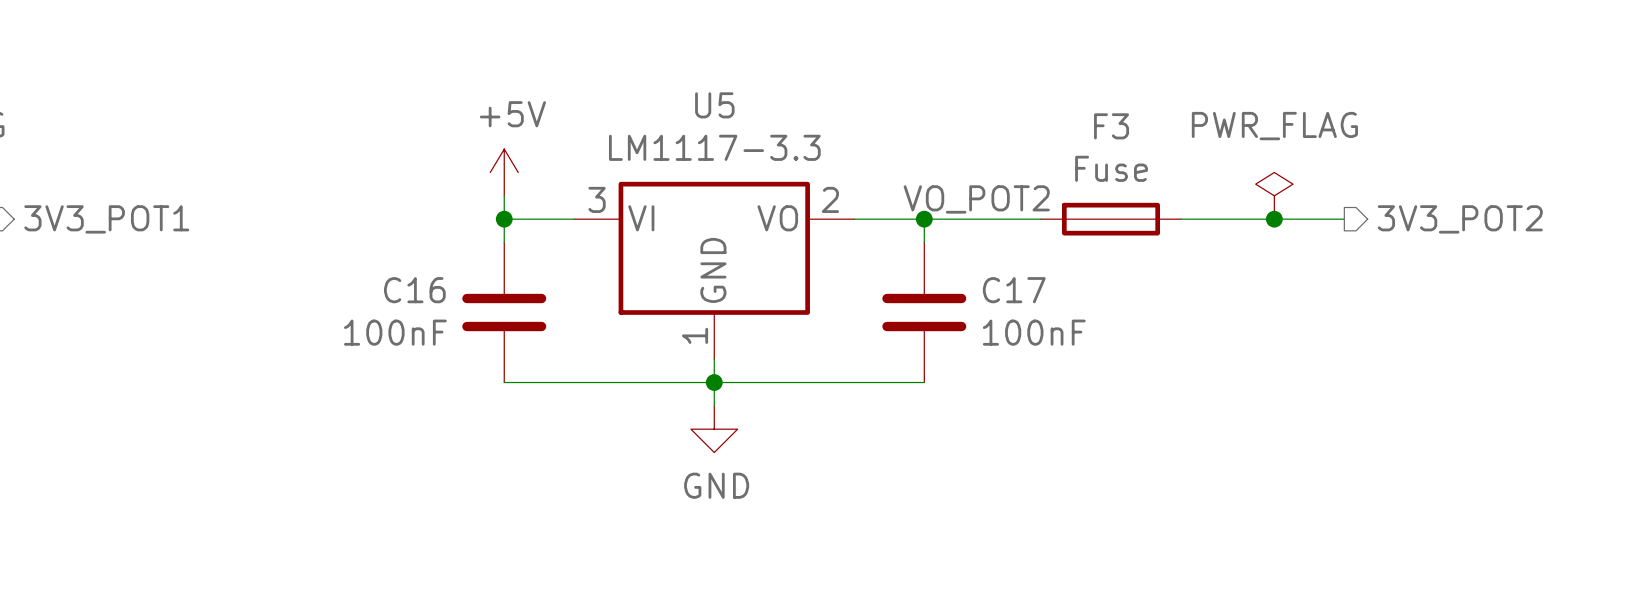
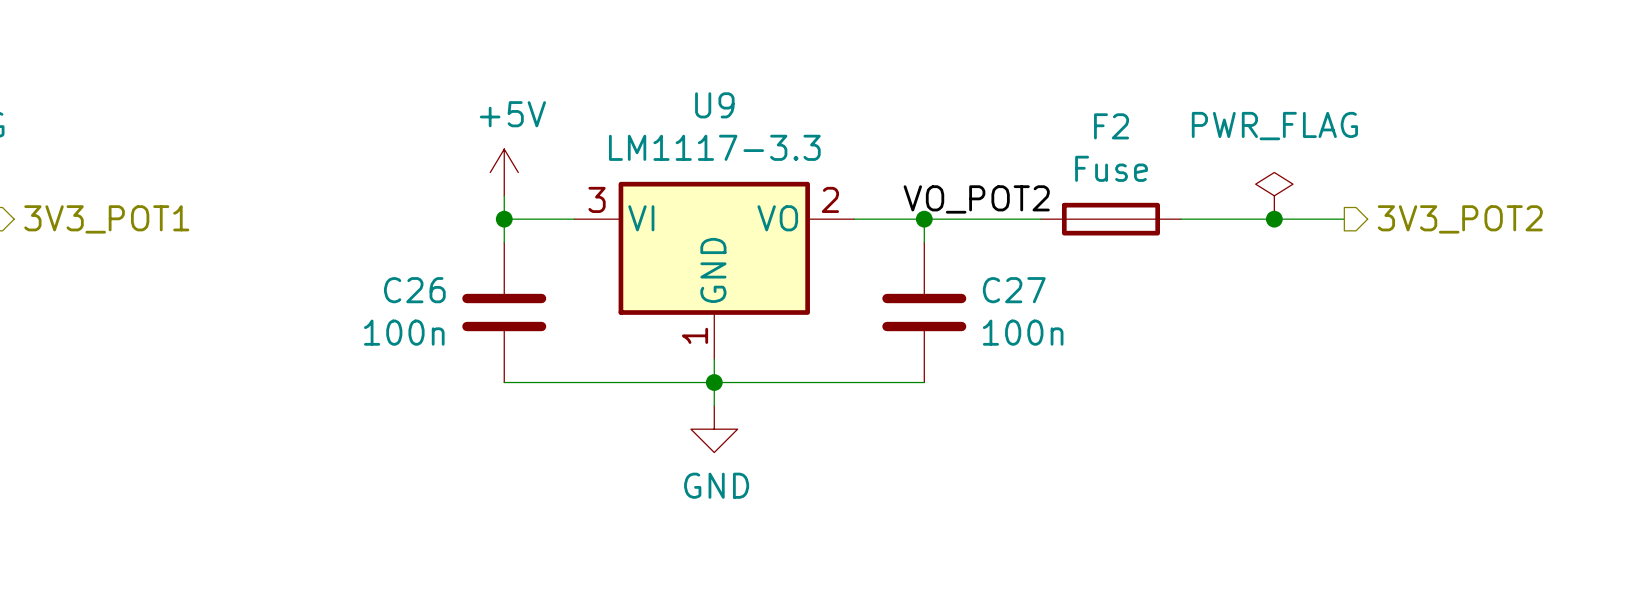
U5 name: U5 (714, 105) -> U9 (714, 105)
F3 name: F3 (1111, 126) -> F2 (1111, 126)
C16 name: C16 (414, 290) -> C26 (414, 290)
C17 name: C17 (1014, 290) -> C27 (1014, 290)
C16 value: 100nF (395, 332) -> 100n (404, 332)
C17 value: 100nF (1034, 332) -> 100n (1023, 332)

